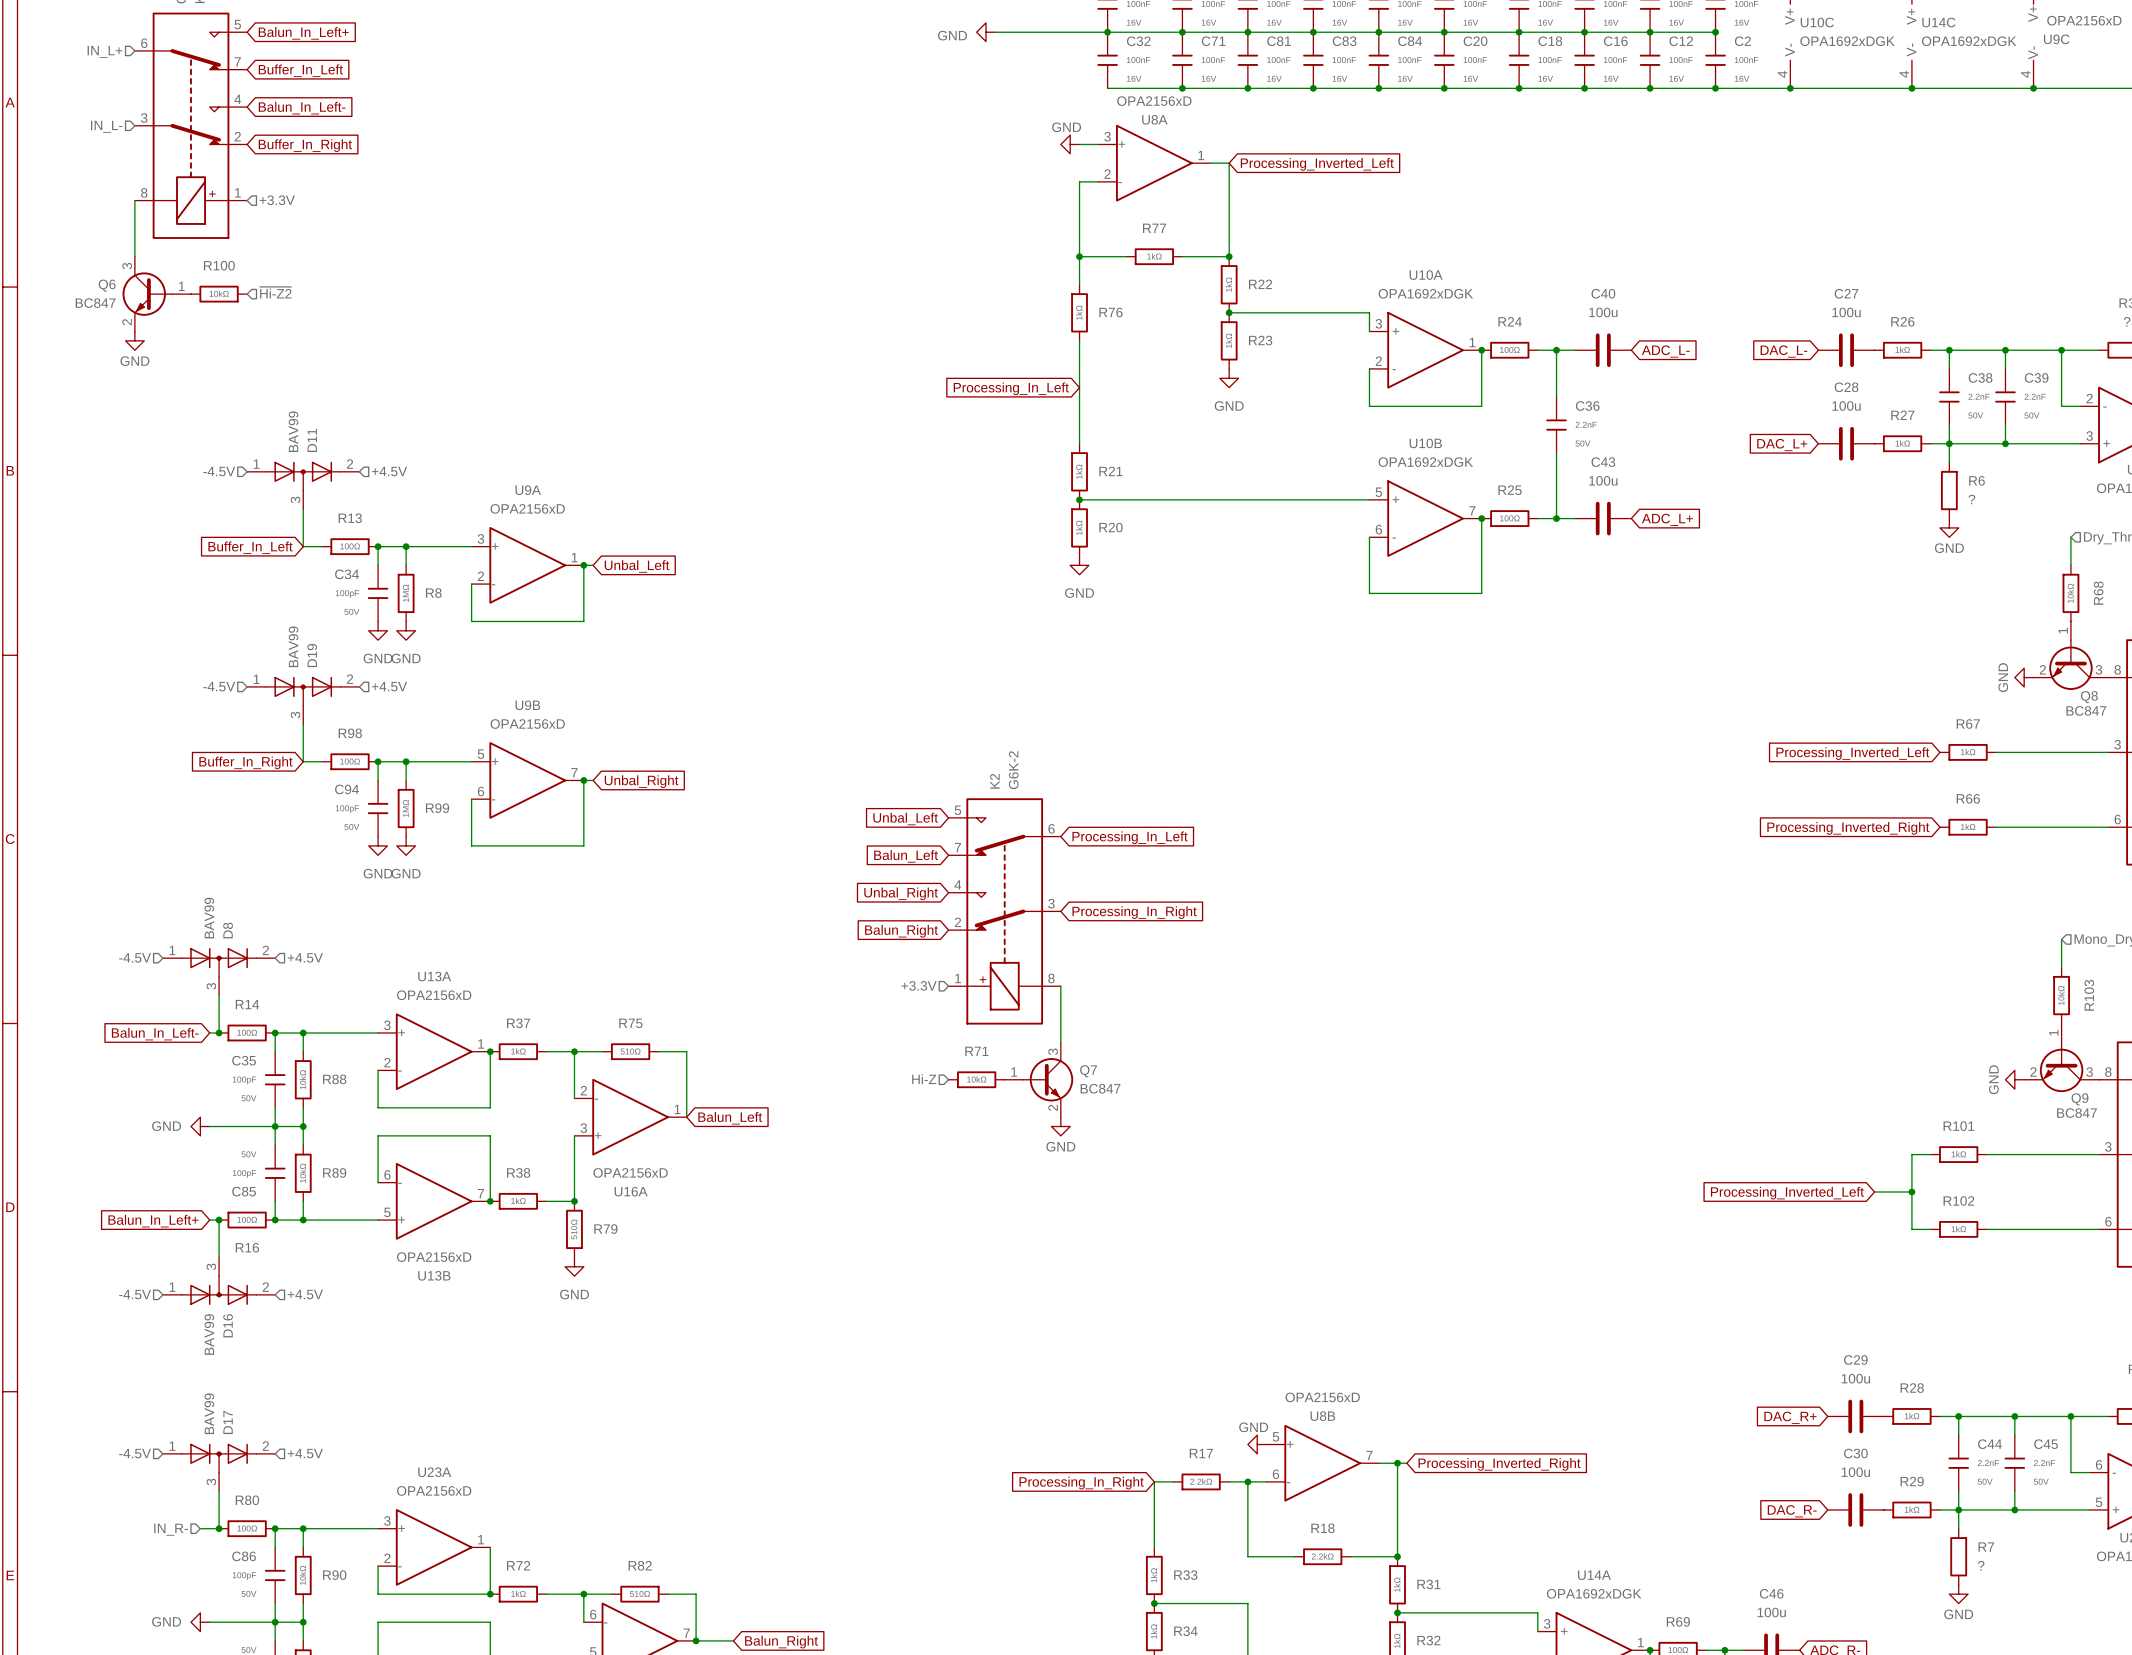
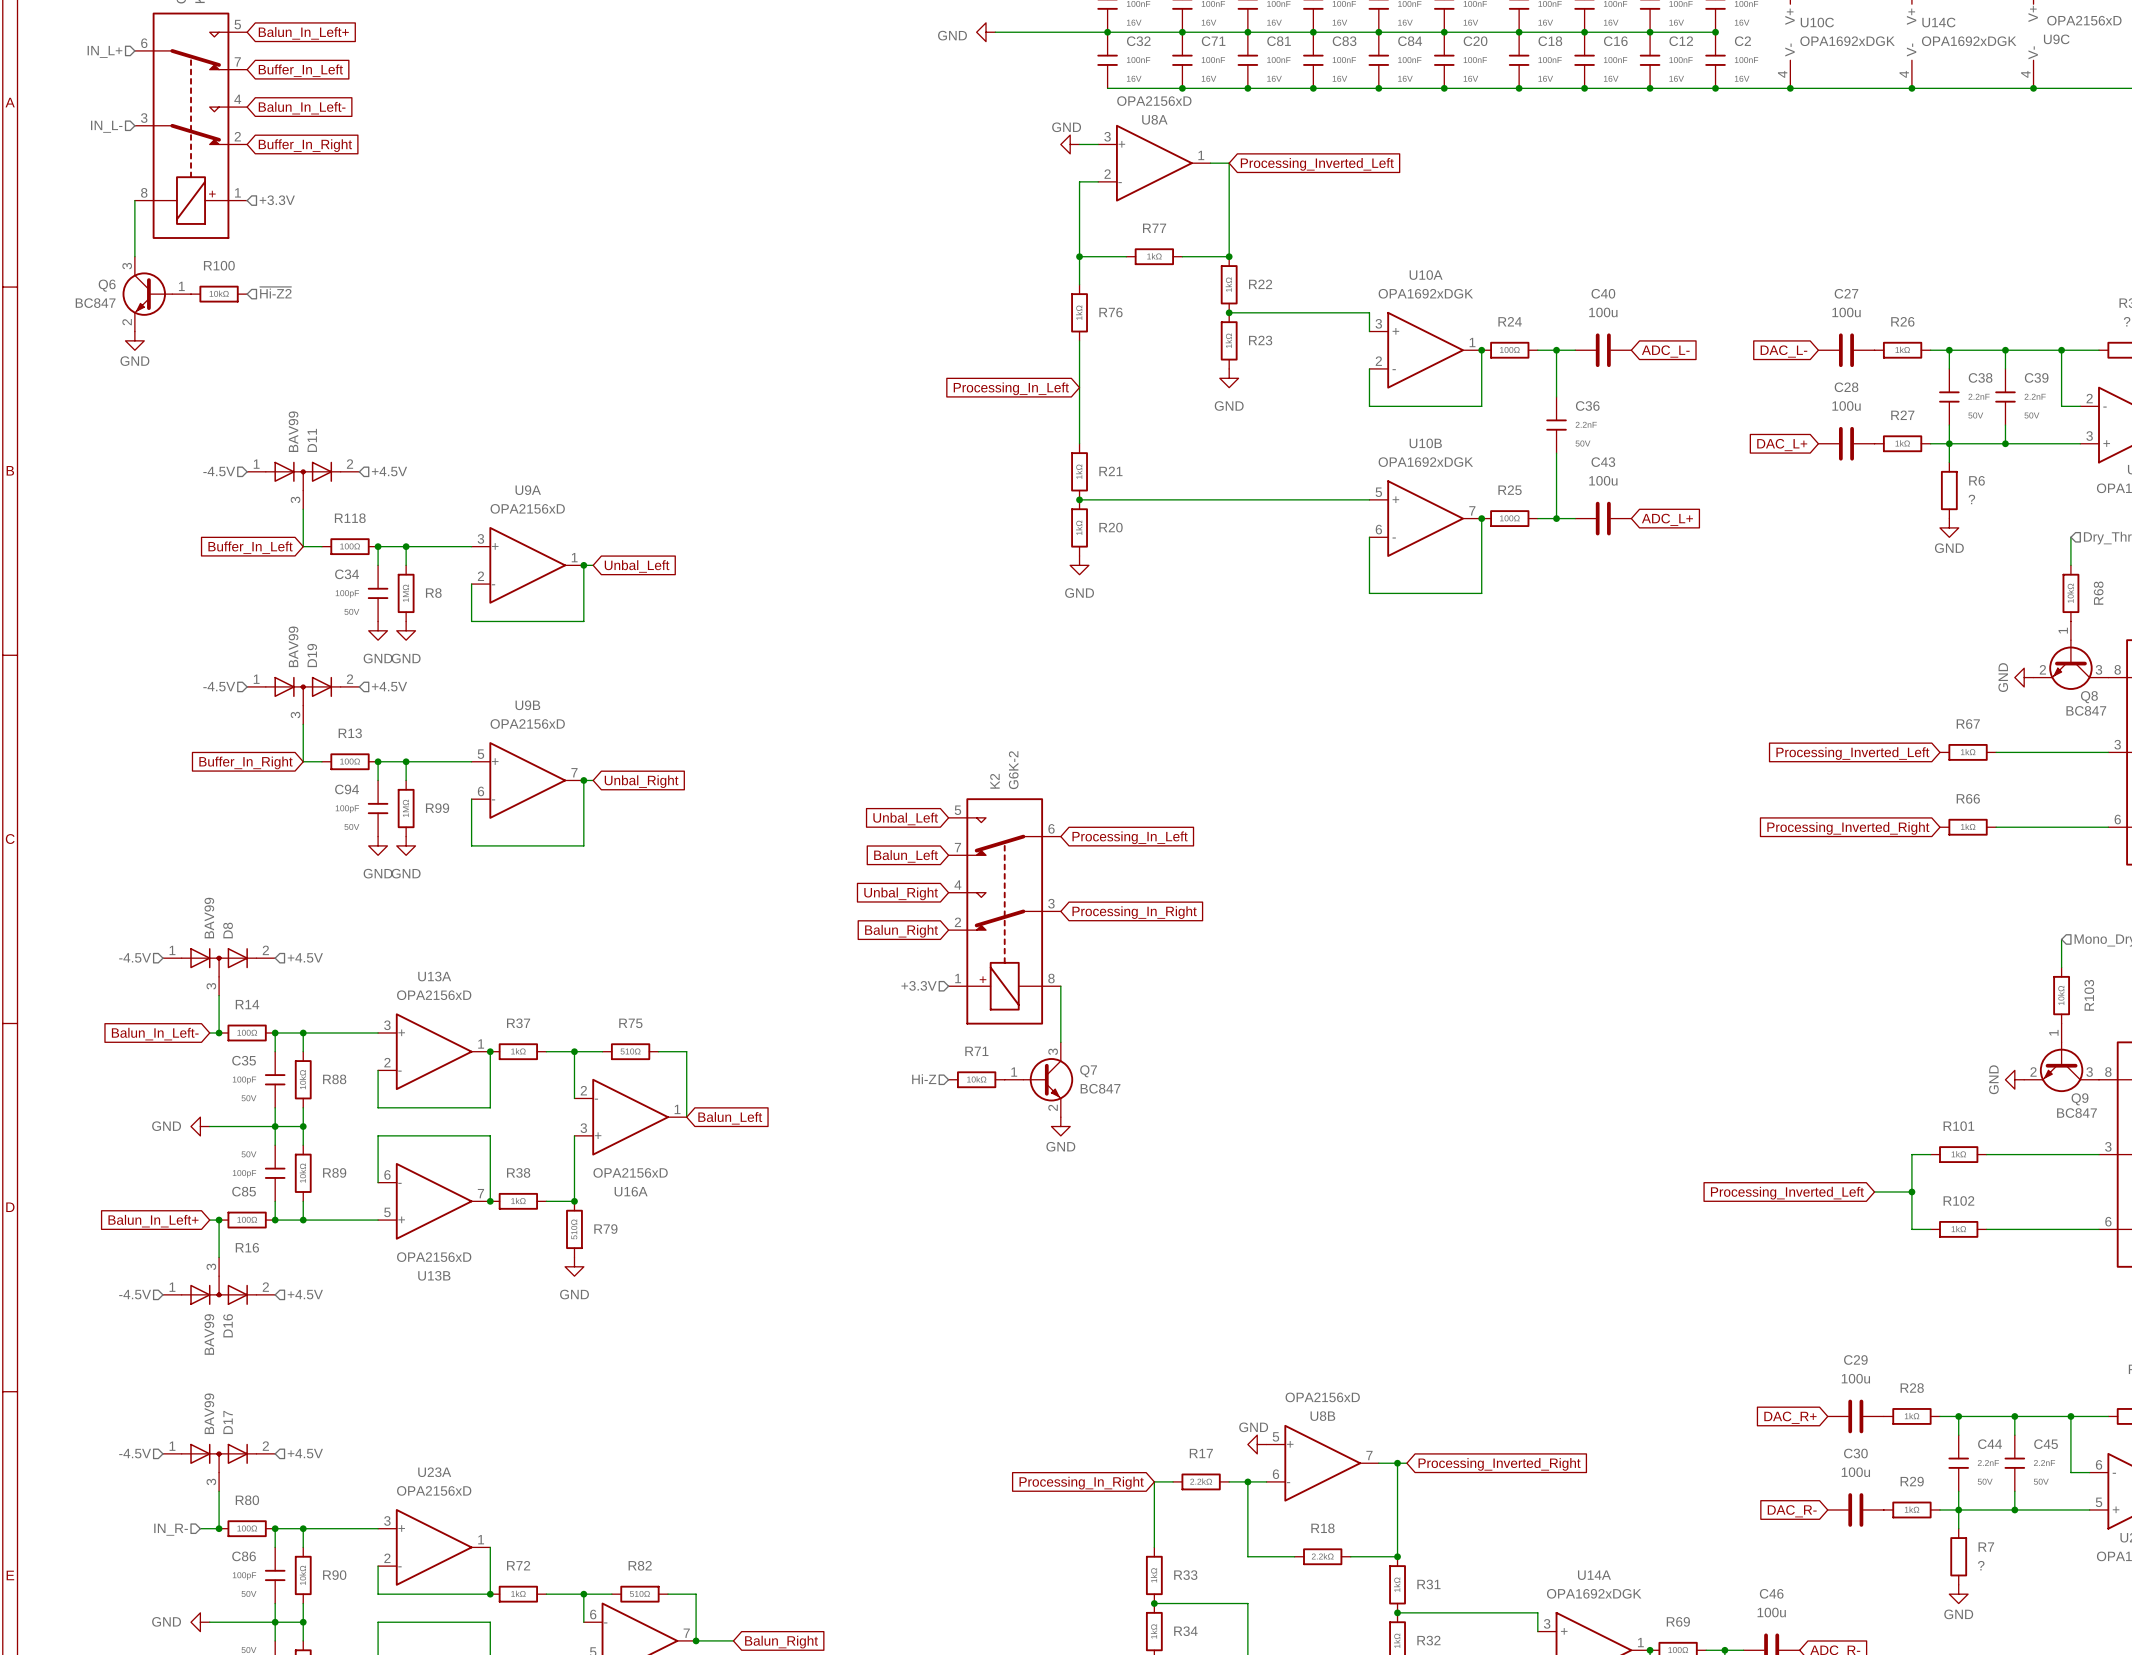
R13 name: R13 (350, 518) -> R118 (350, 518)
R98 name: R98 (350, 733) -> R13 (350, 733)

